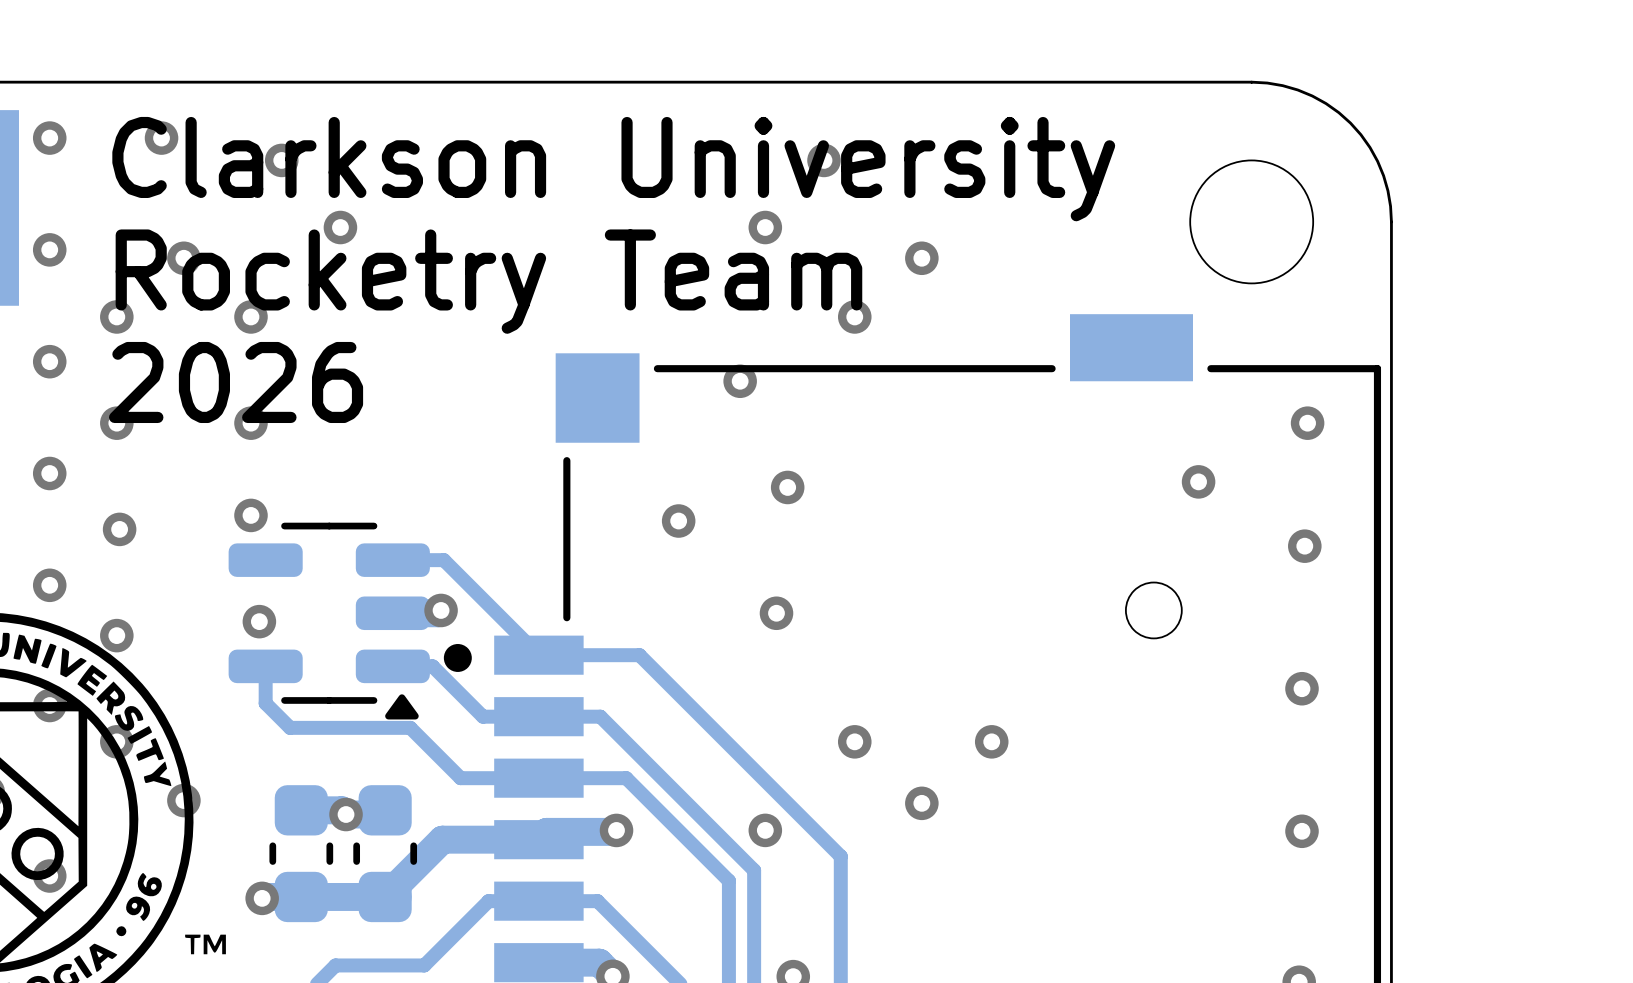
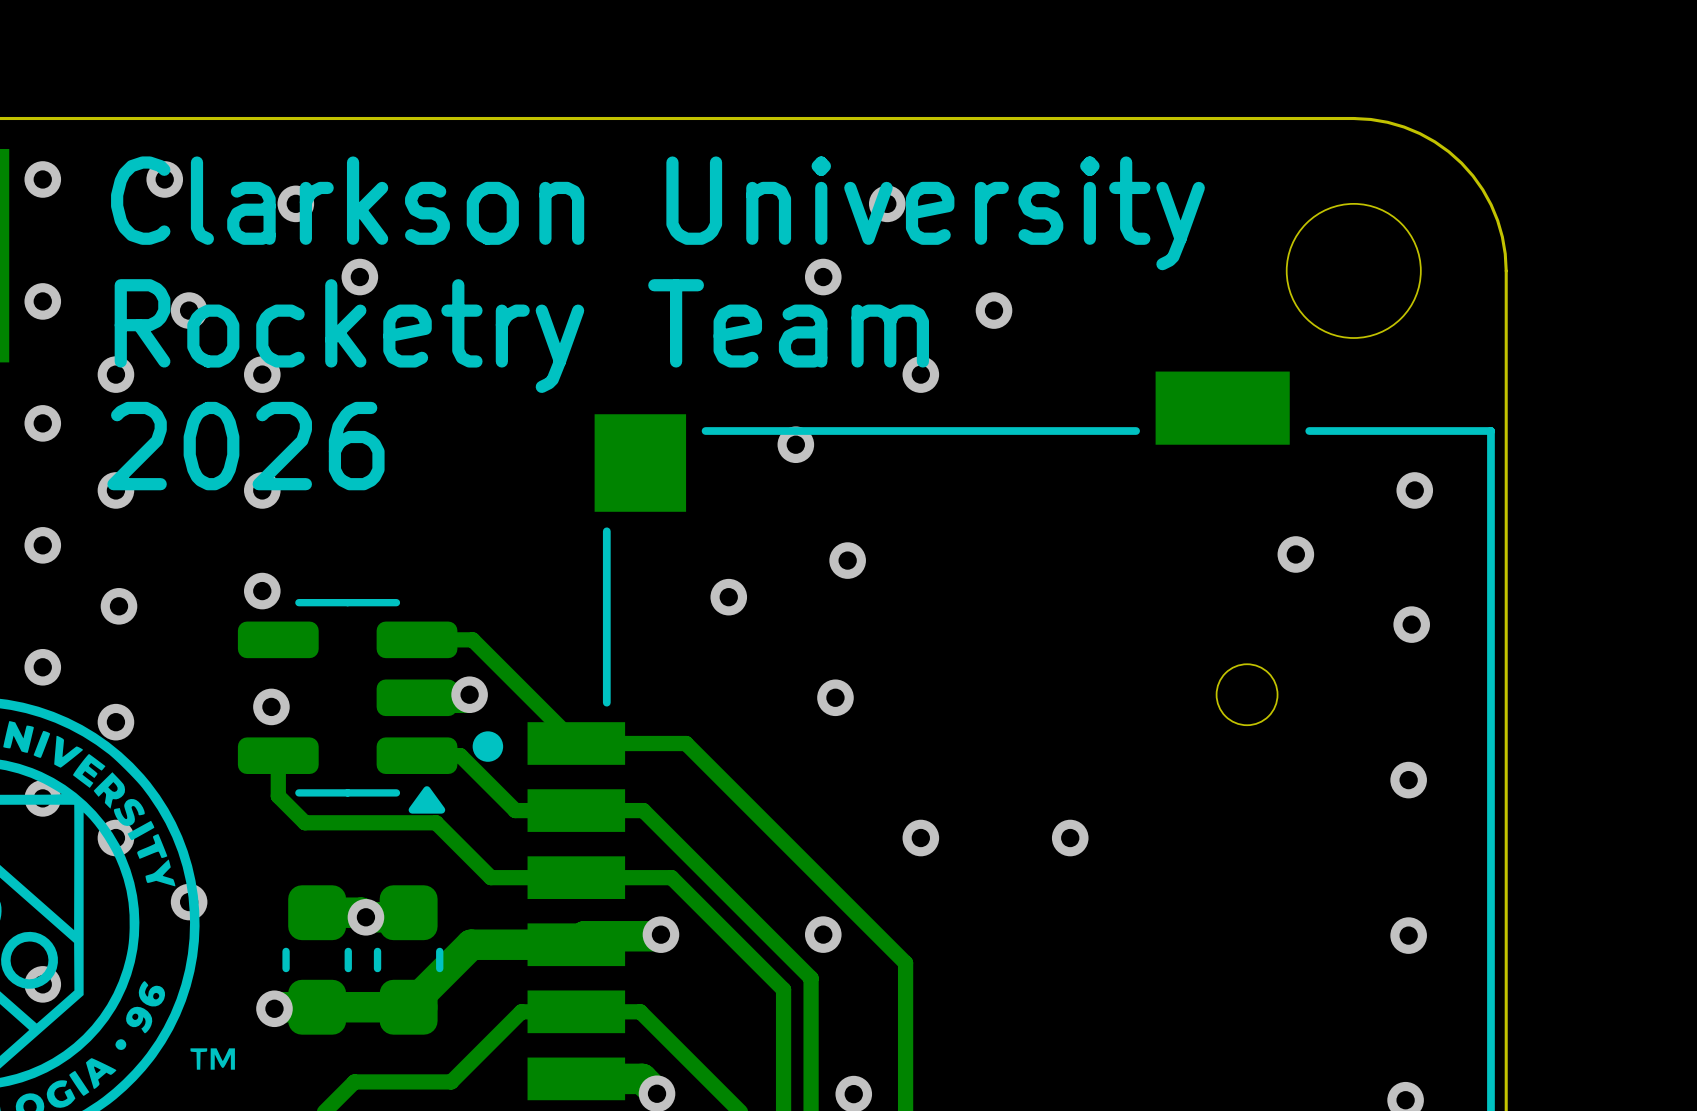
via: (921, 803) -> none

